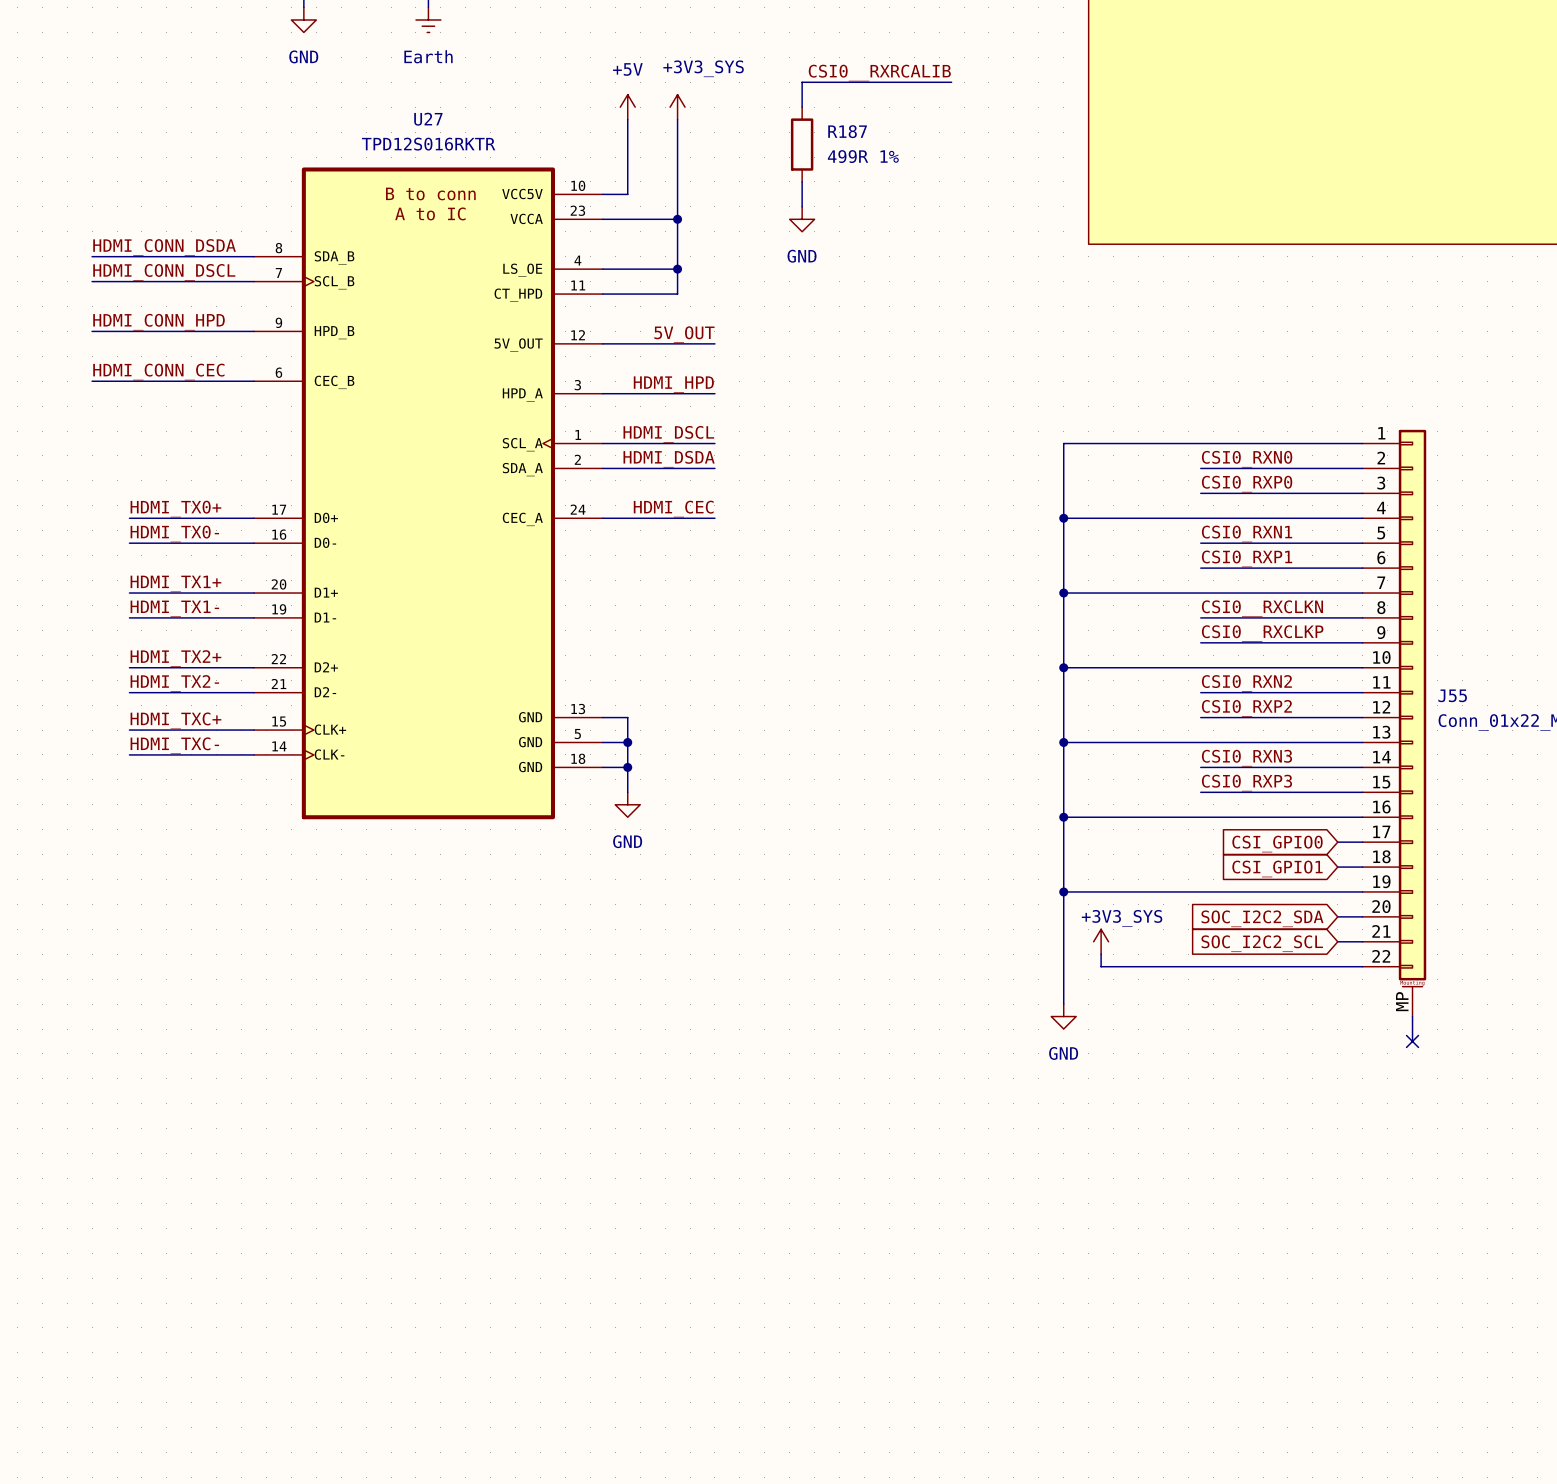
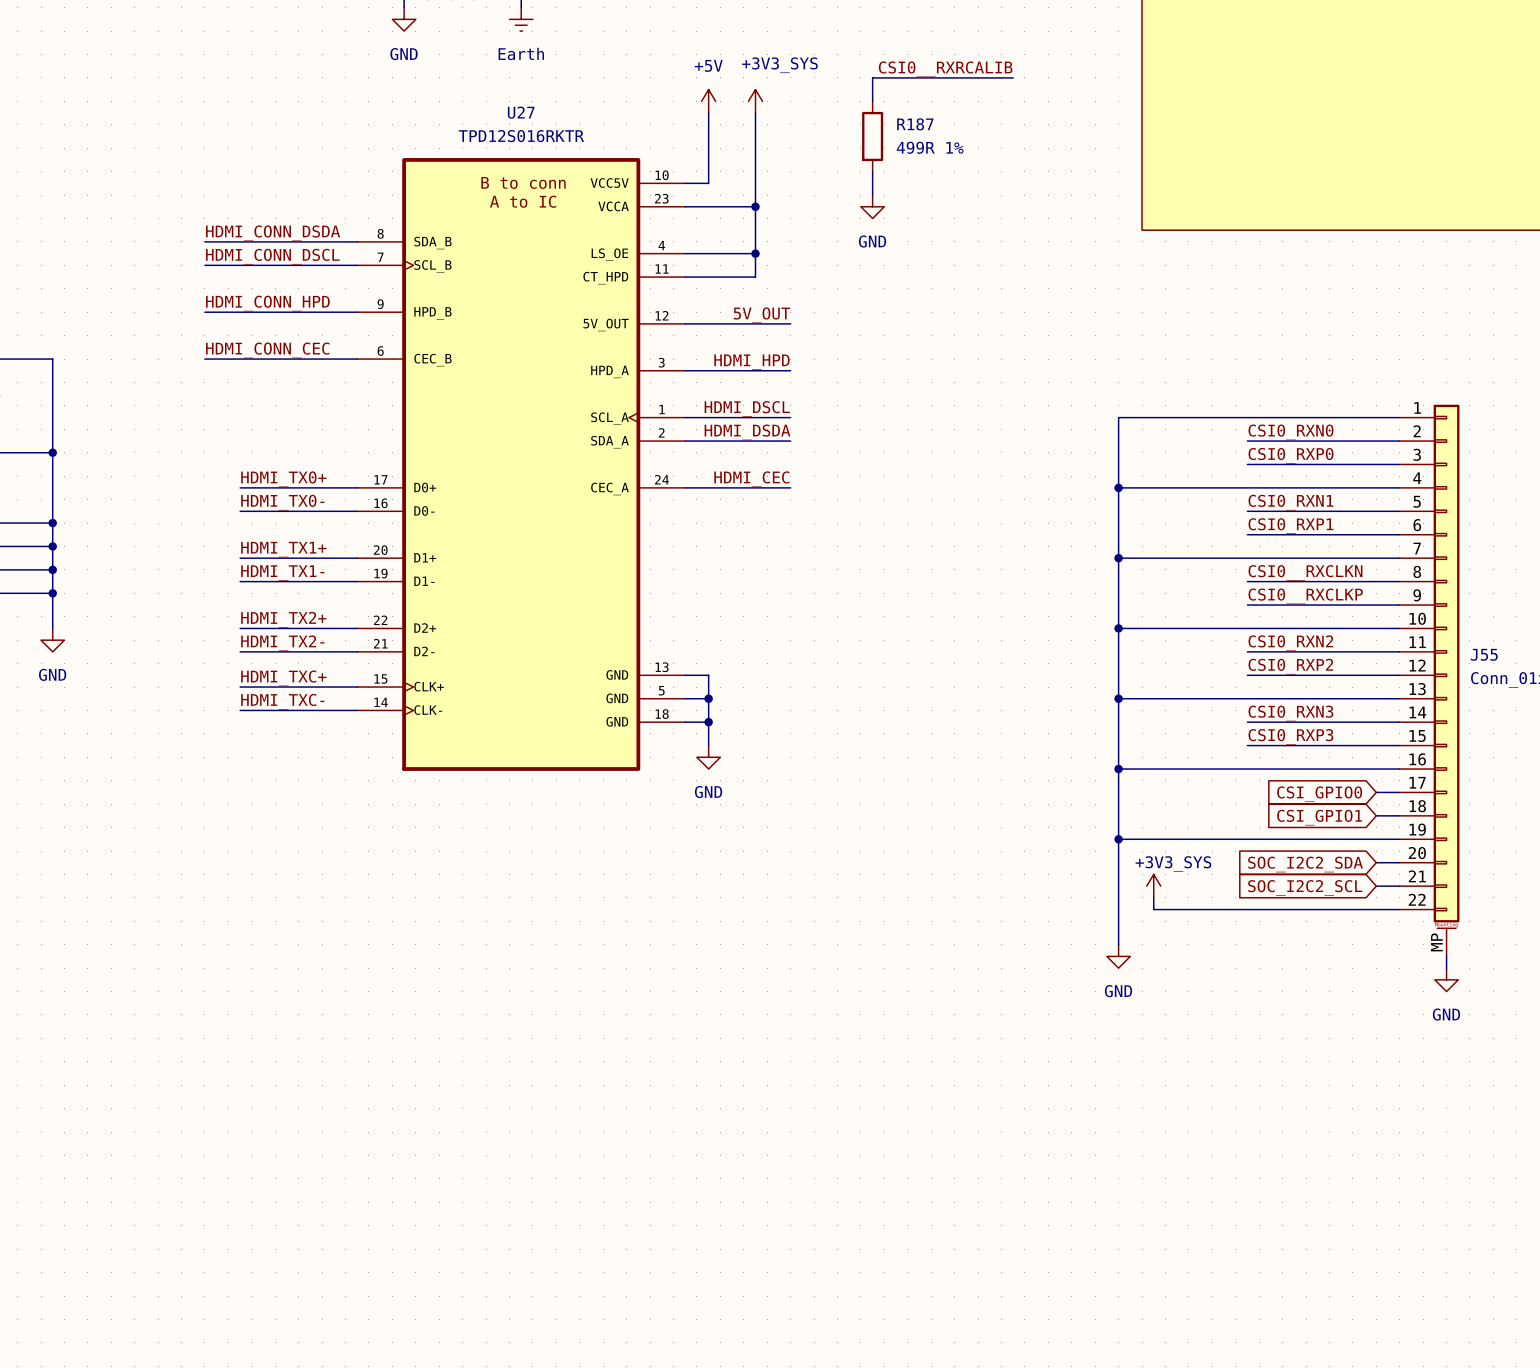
no-connect mark: (1412, 1041) -> none
power symbol: none -> GND (1446, 979)

